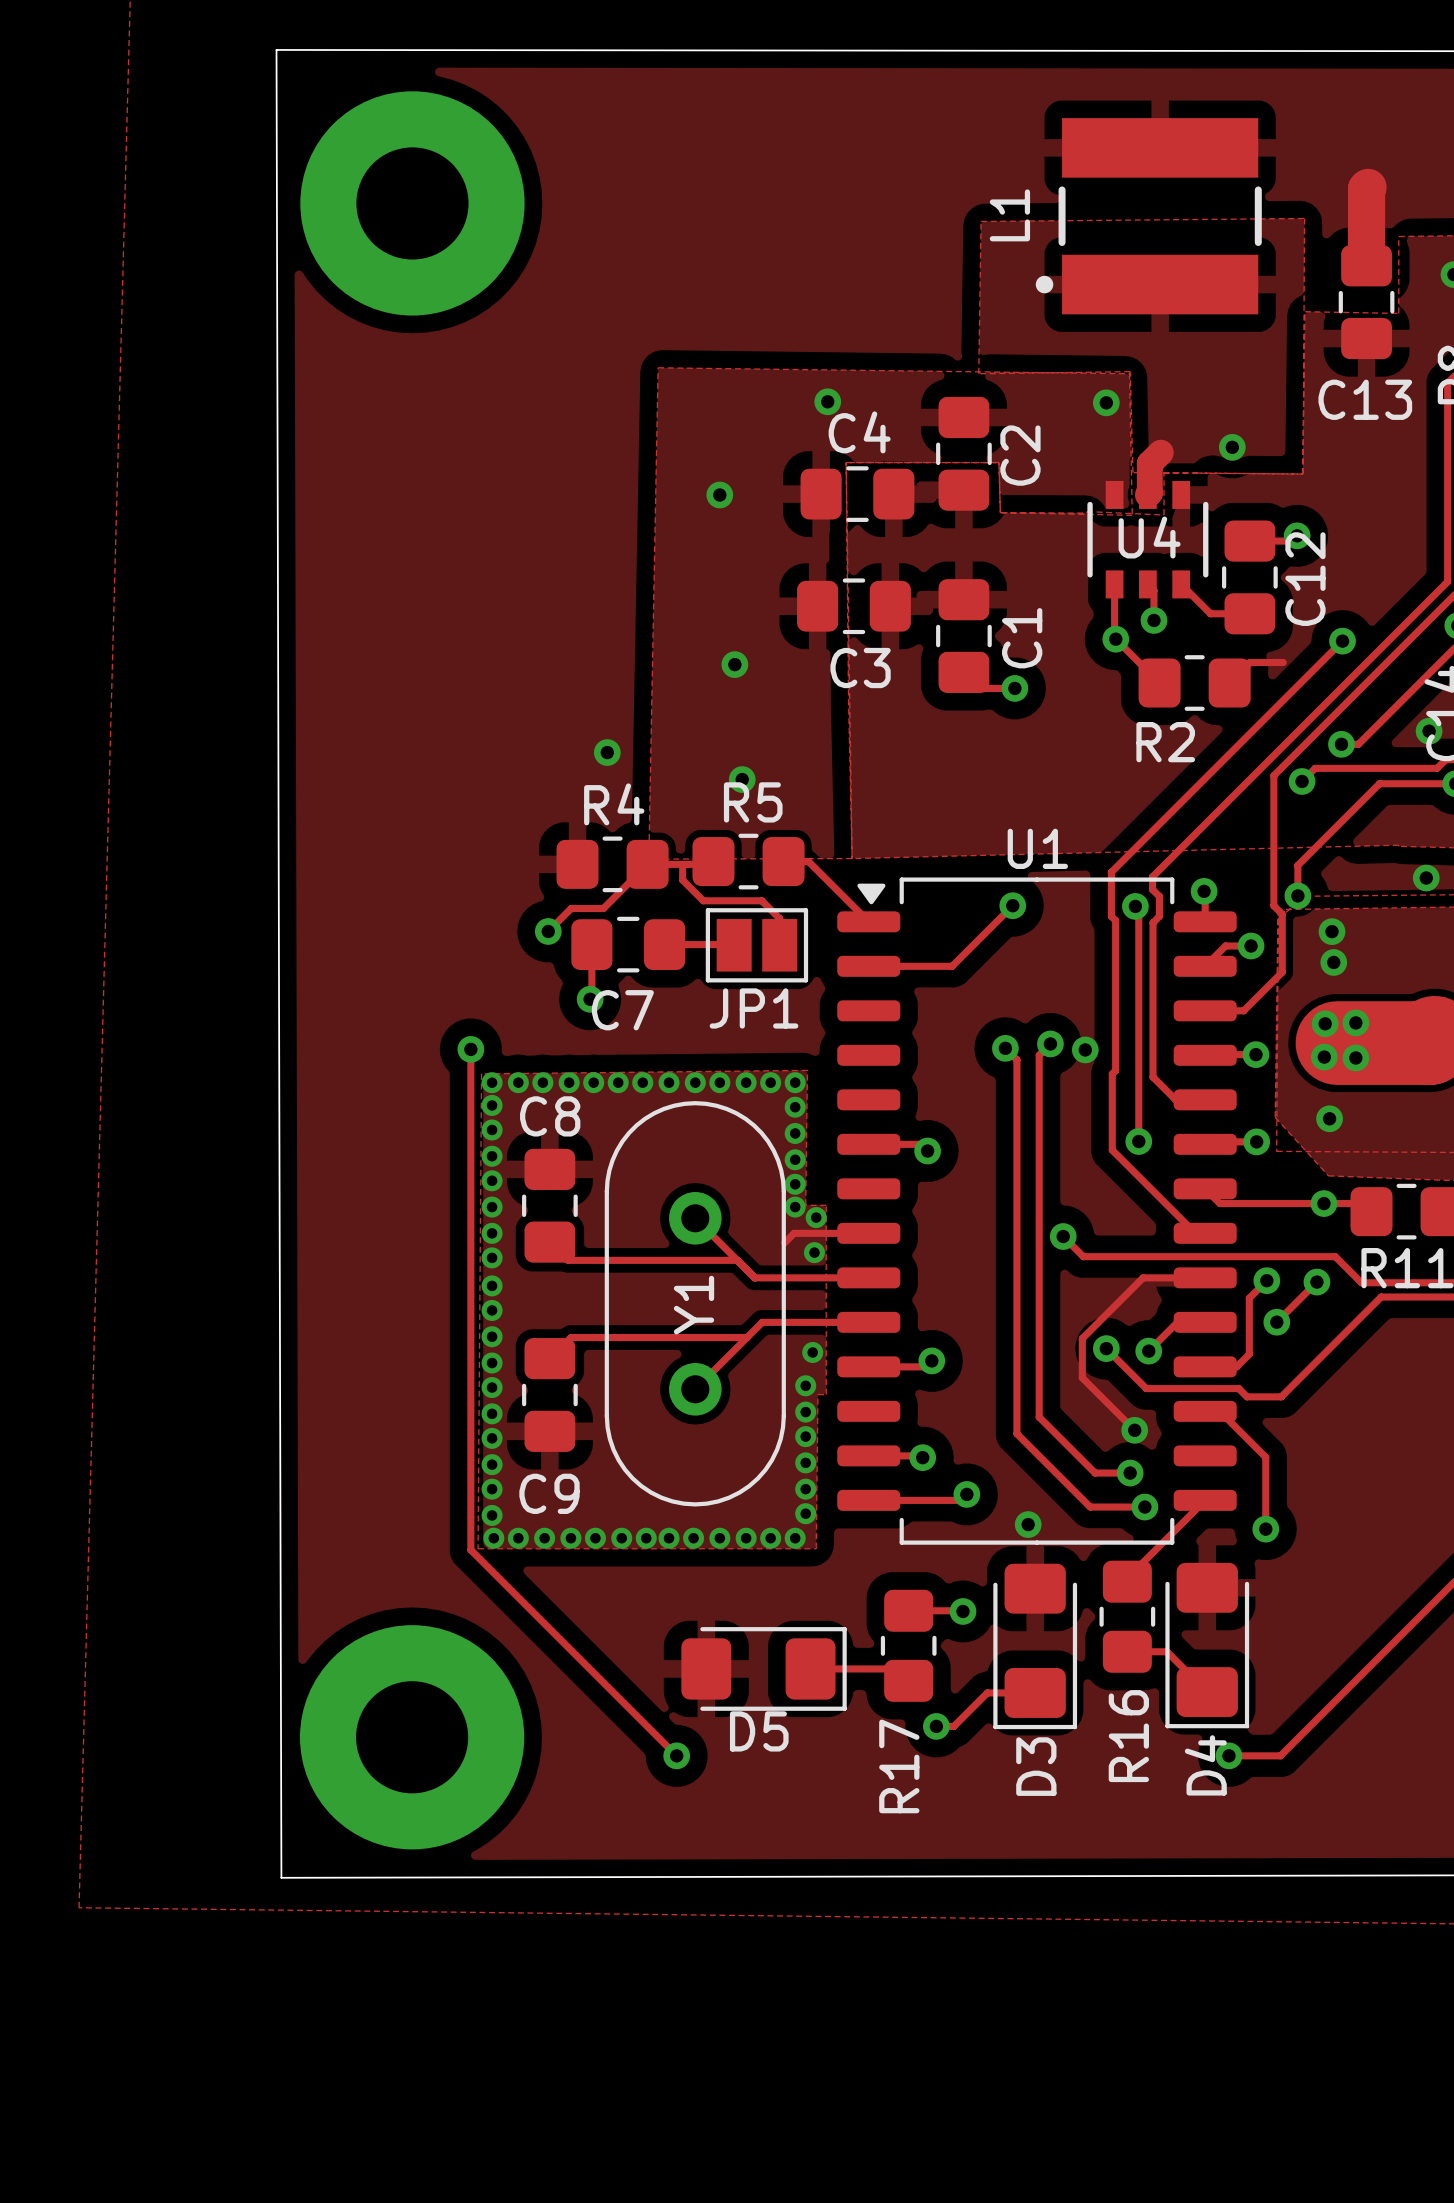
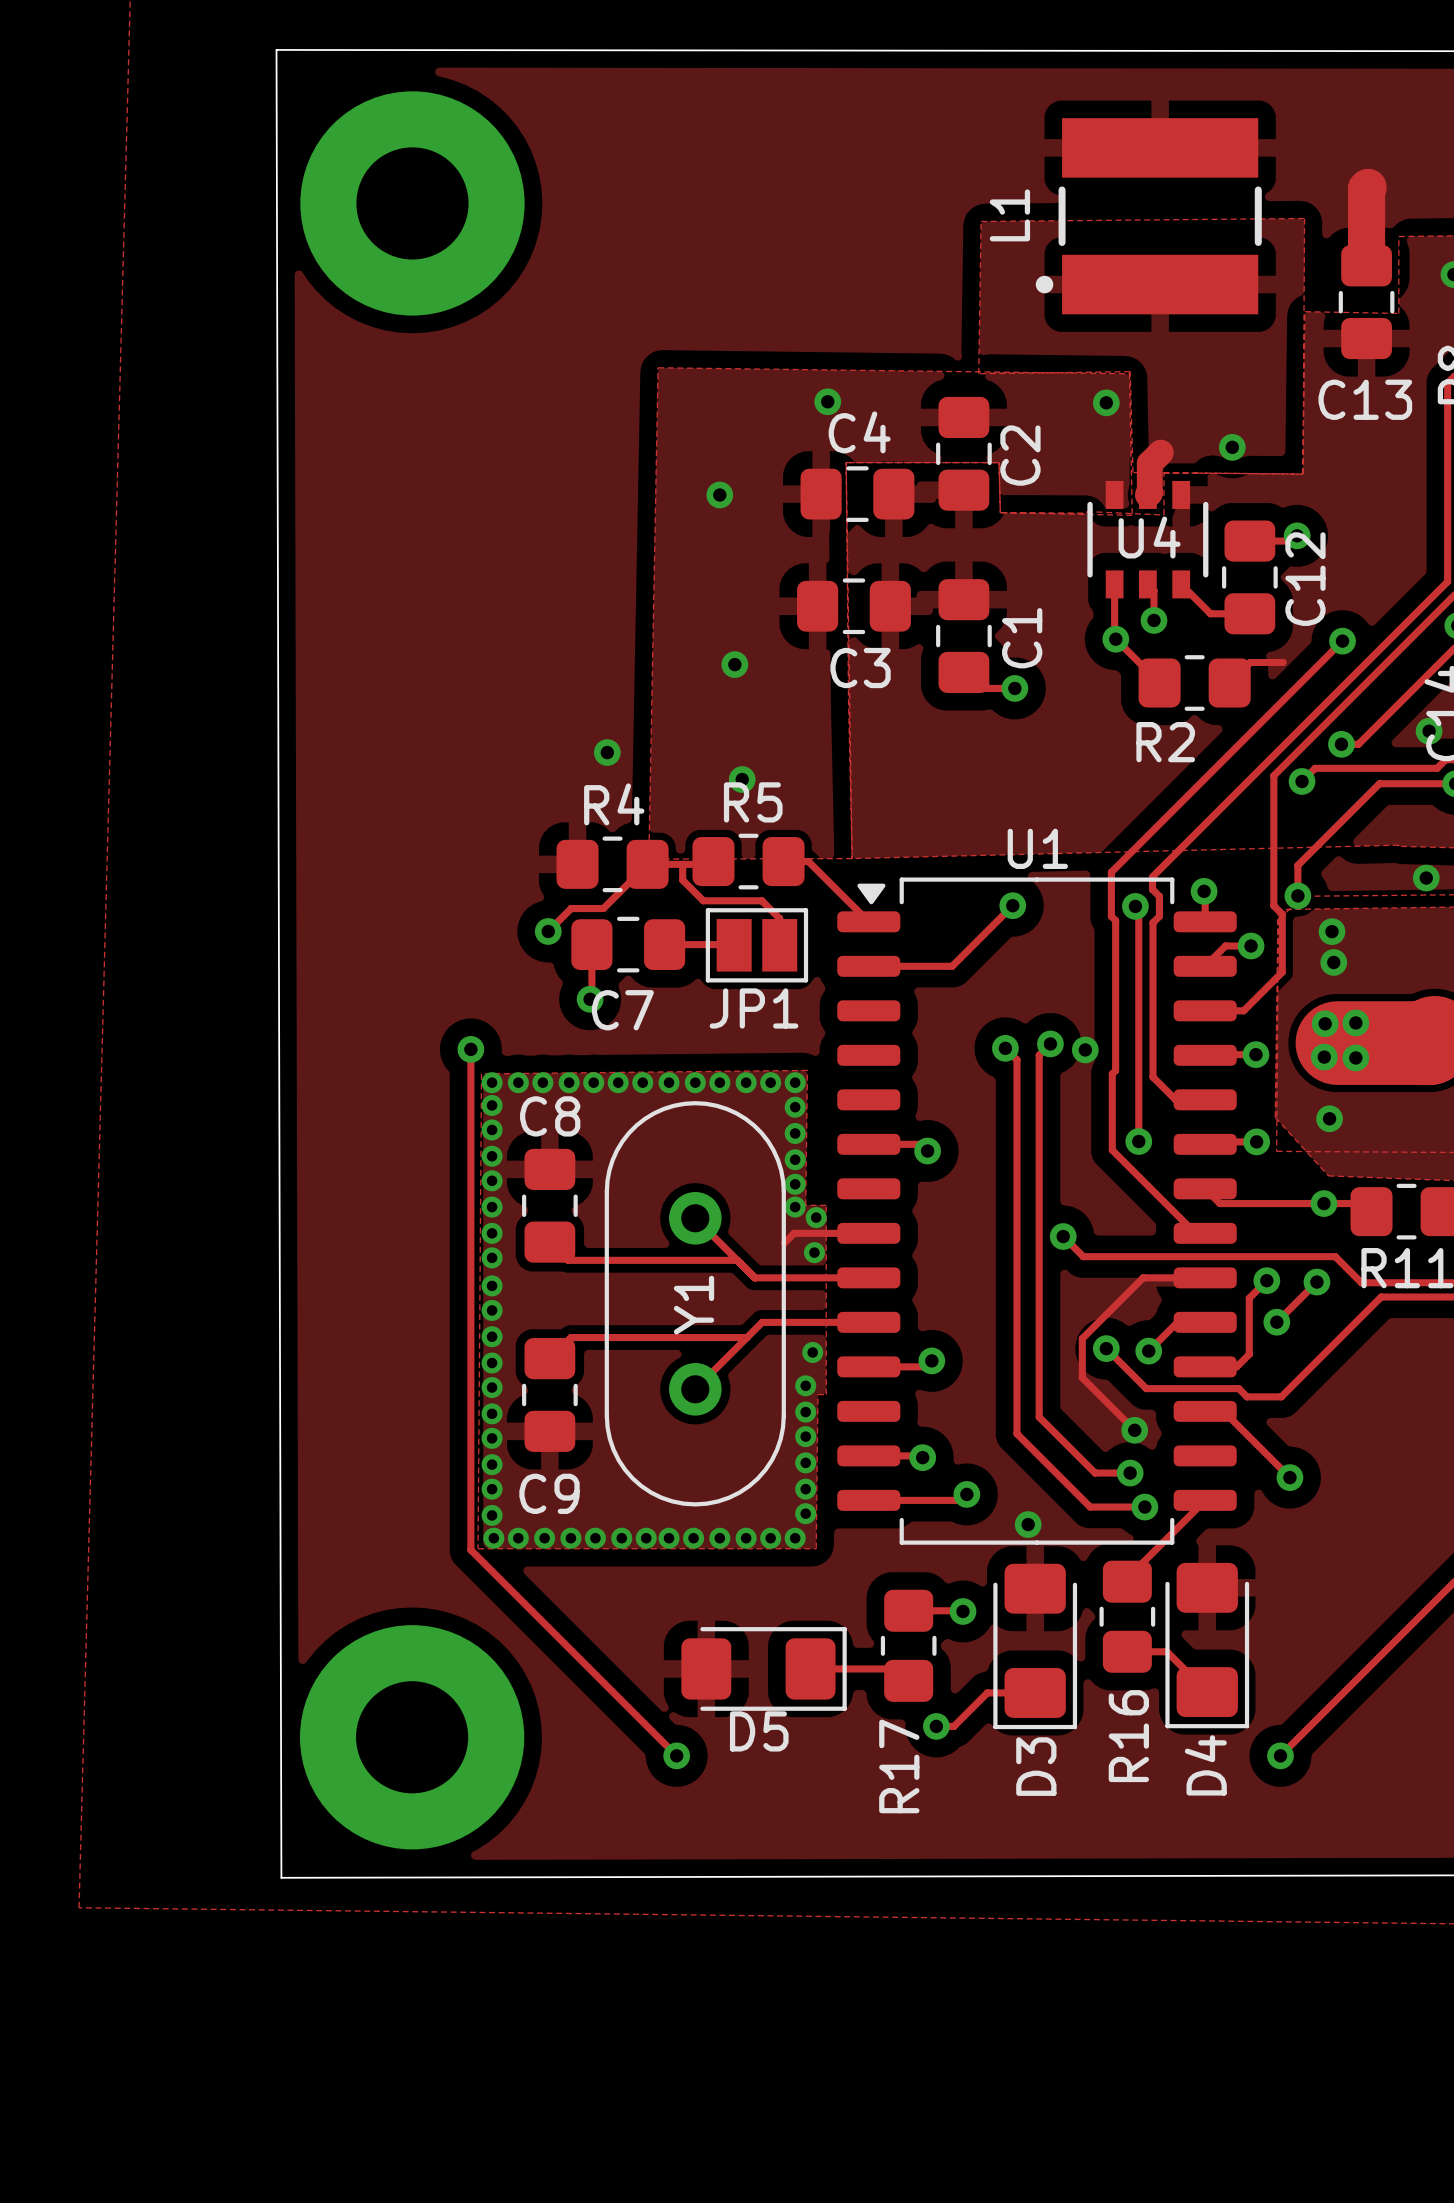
track: (1219, 1411) (1265, 1457) (1265, 1529) -> (1219, 1411) (1223, 1411) (1289, 1477)
via position: (1265, 1529) -> (1289, 1477)
track: (1228, 1755) (1280, 1755) -> none
via position: (1228, 1755) -> (1280, 1755)

